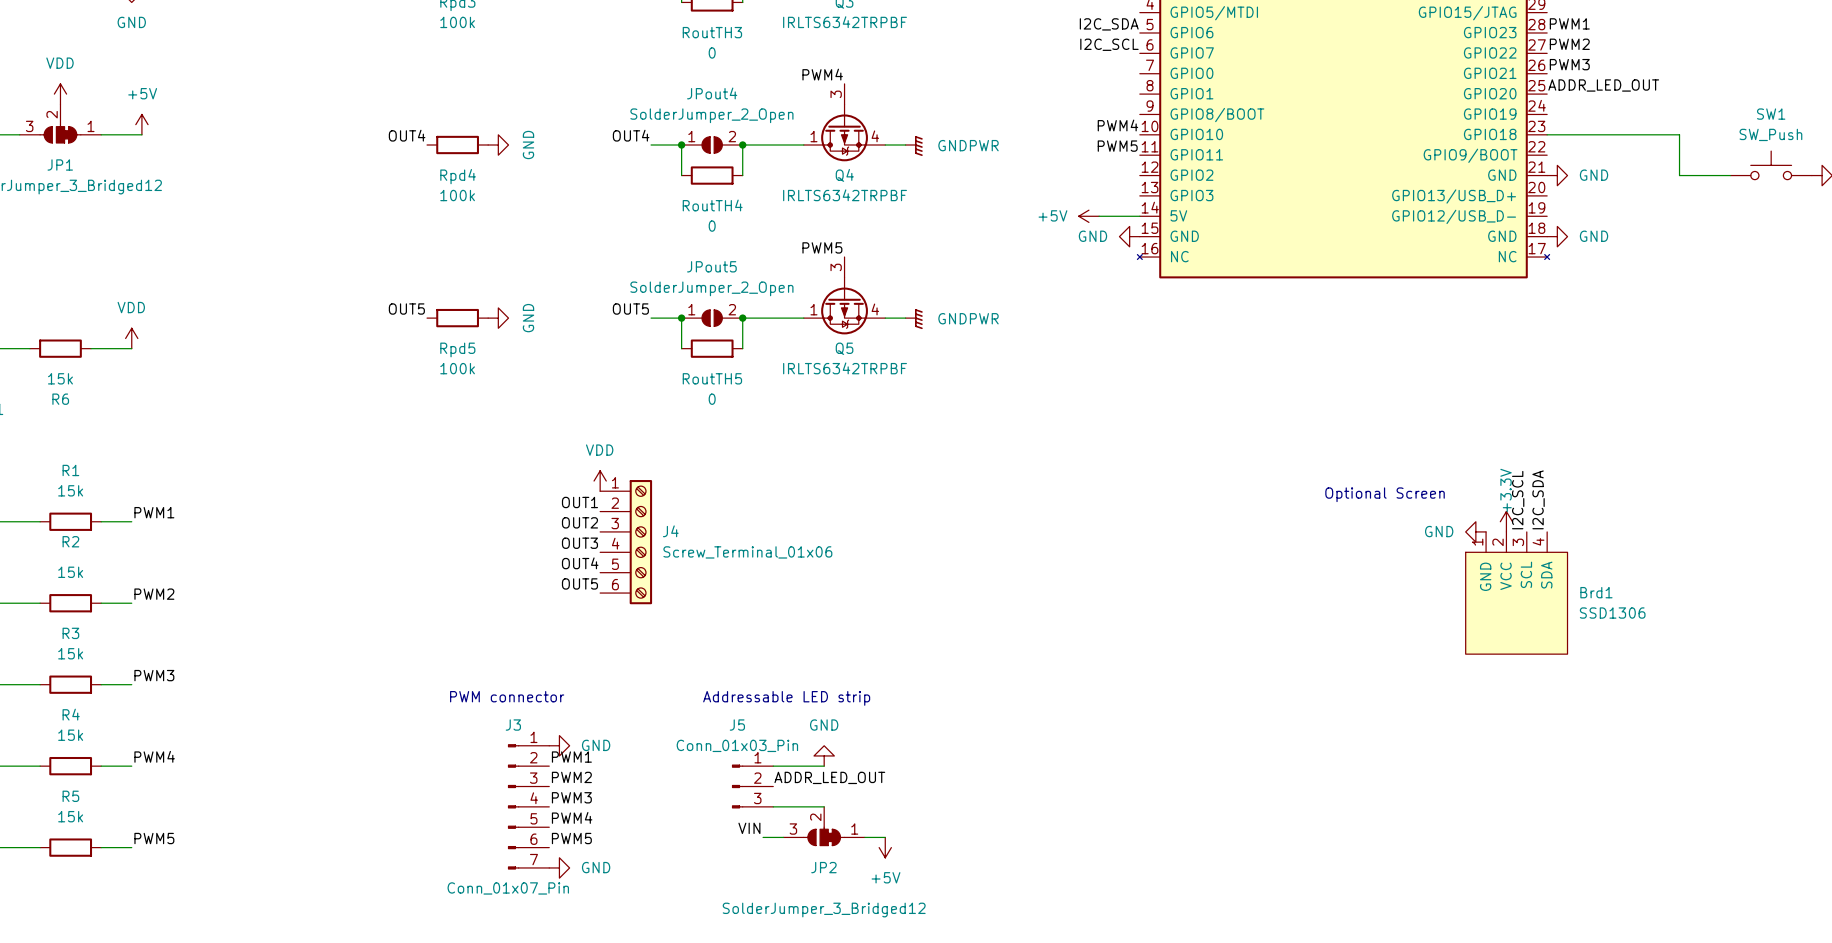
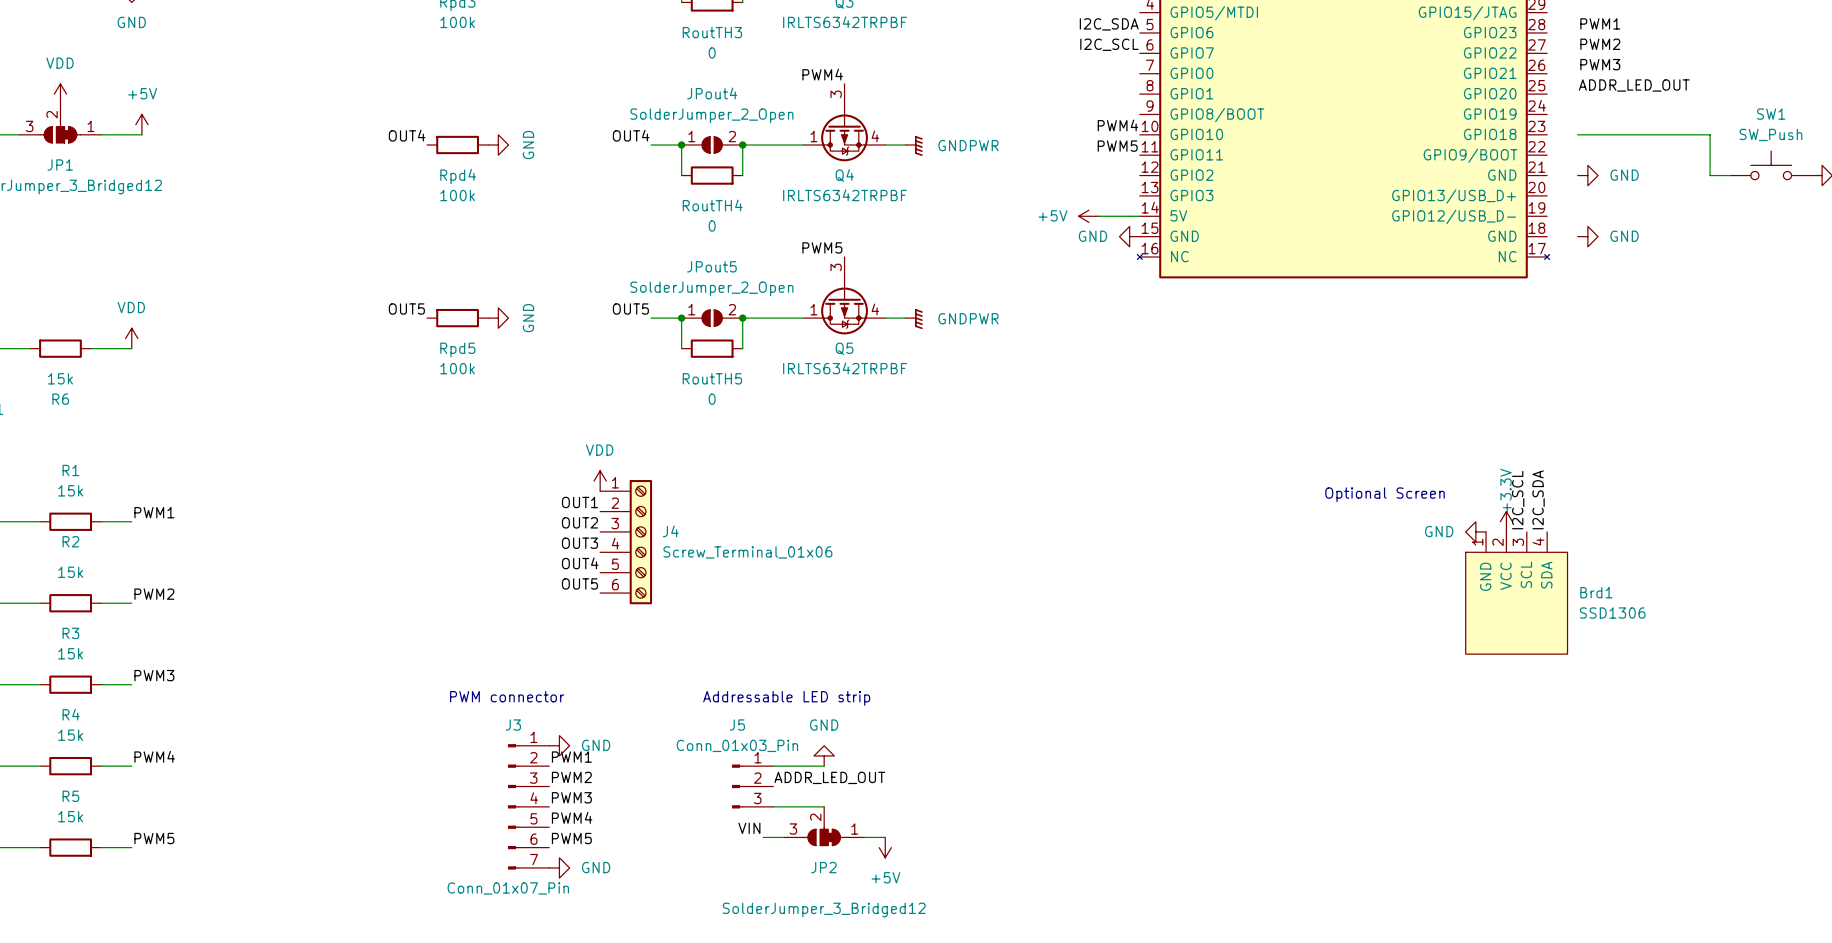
label position: PWM1 (1569, 23) -> PWM1 (1600, 23)
label position: PWM2 (1569, 44) -> PWM2 (1600, 44)
label position: PWM3 (1569, 64) -> PWM3 (1600, 64)
label position: ADDR_LED_OUT (1603, 85) -> ADDR_LED_OUT (1634, 85)
wire: (1547, 134) (1577, 134) -> none
wire: (1679, 134) (1679, 175) (1710, 175) -> (1679, 134) (1710, 134) (1710, 175)
power symbol position: GND (1557, 175) -> GND (1587, 175)
power symbol position: GND (1557, 236) -> GND (1587, 236)

